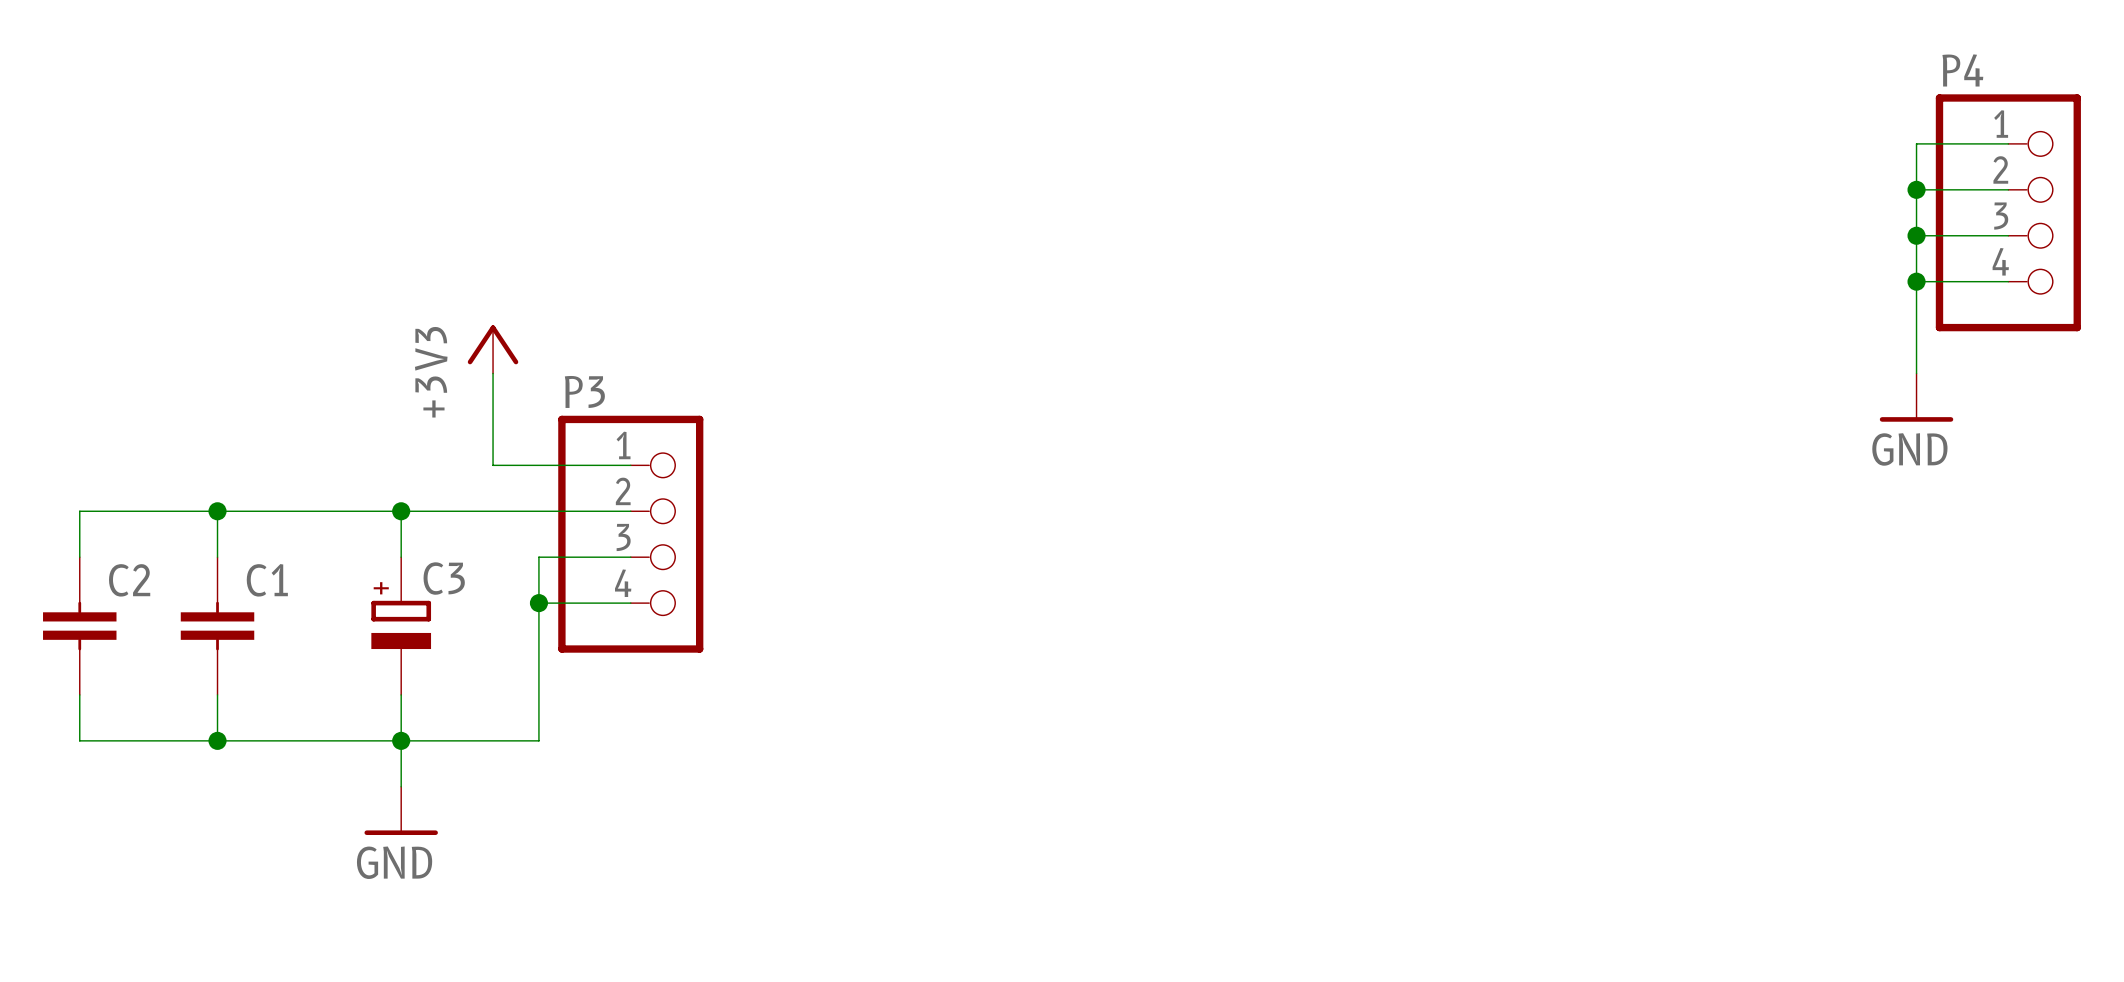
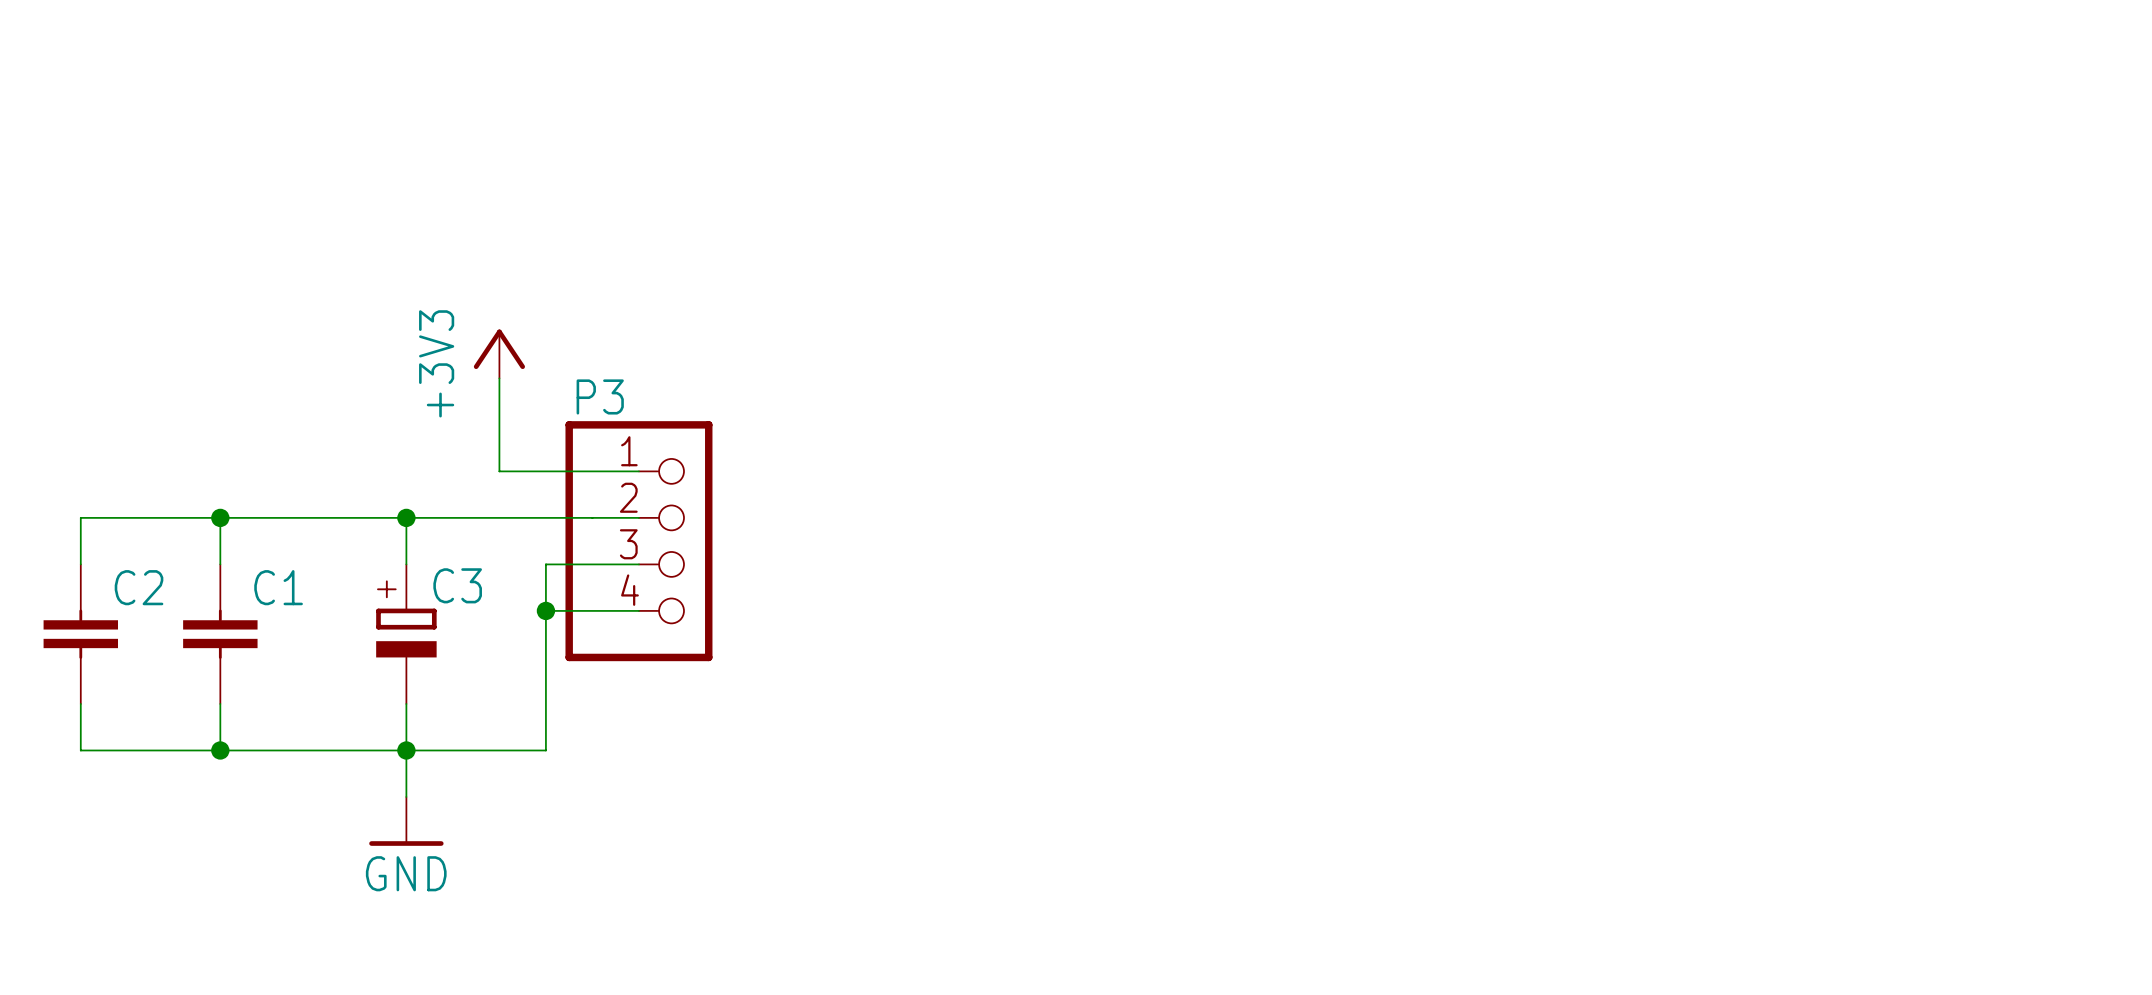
wire: (2008, 143) (1916, 143) (1916, 373) -> none
wire: (1916, 189) (2008, 189) -> none
junction: (1916, 189) -> none
P4: (2008, 212) -> none
wire: (1916, 235) (2008, 235) -> none
junction: (1916, 235) -> none
wire: (1916, 281) (2008, 281) -> none
junction: (1916, 281) -> none
power symbol: GND (1916, 397) -> none

